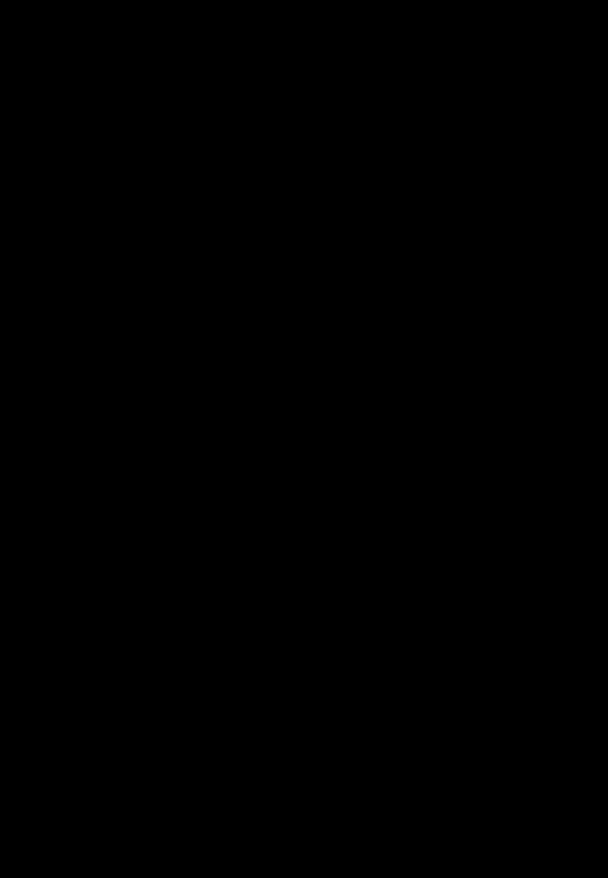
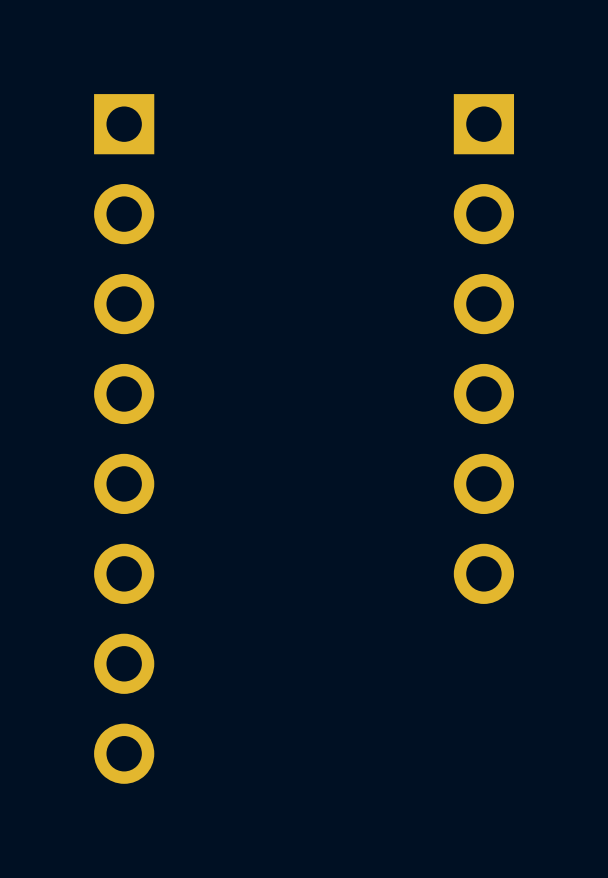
part: none -> (483, 349)
part: none -> (124, 438)

